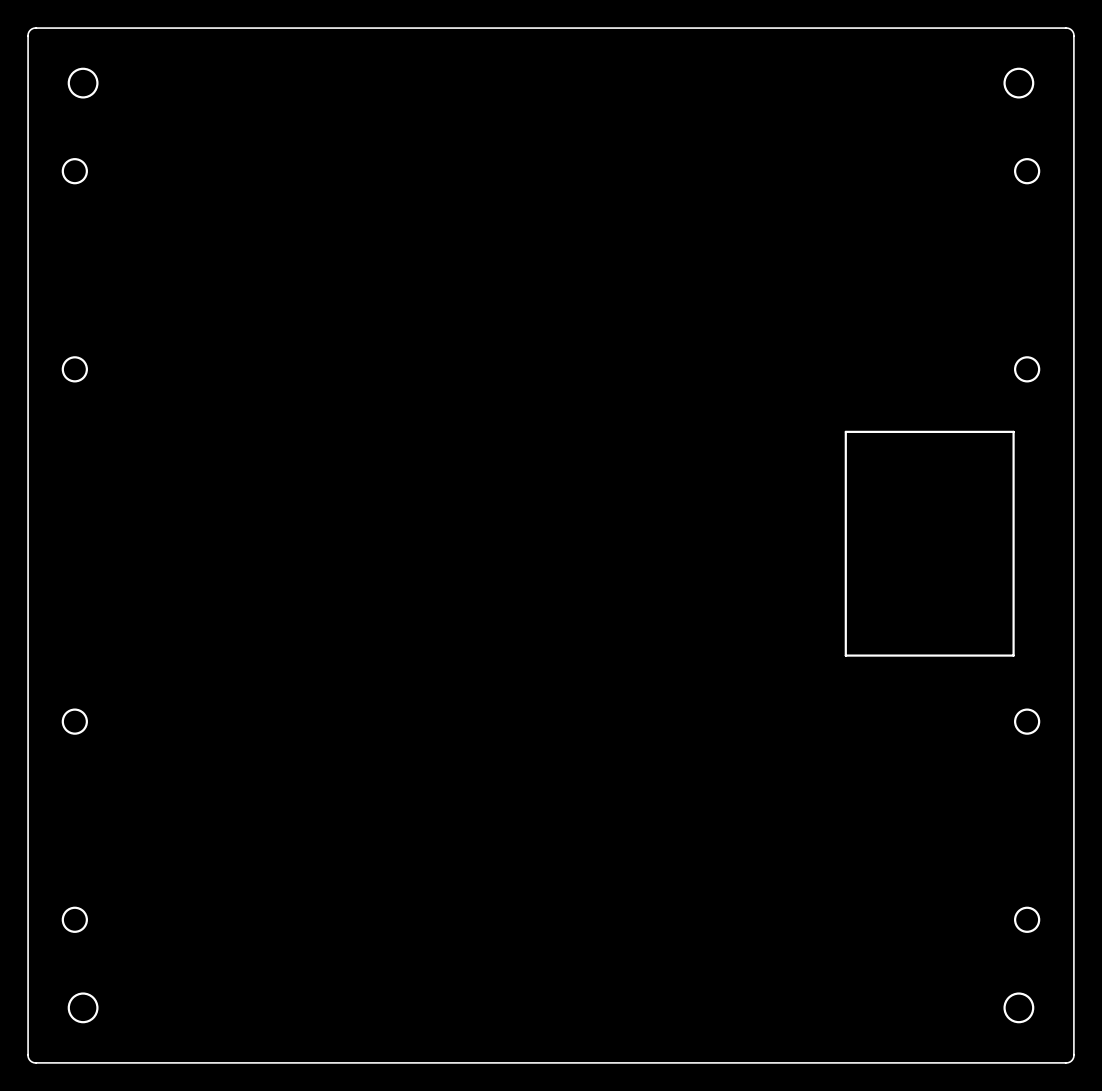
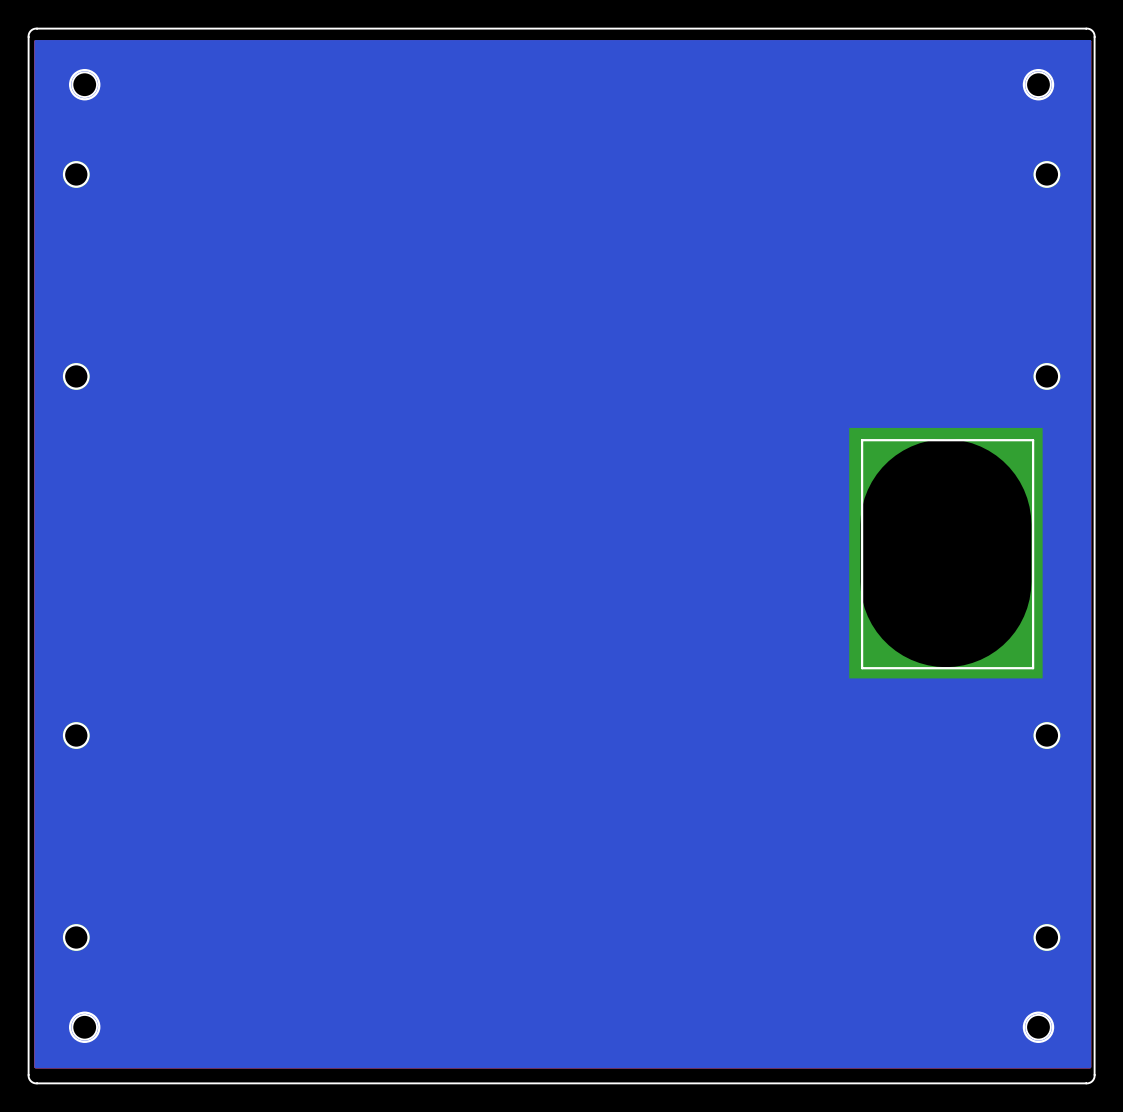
drawing: none -> [34, 40, 1092, 1069]
part: none -> (84, 84)
part: none -> (1038, 84)
part: none -> (76, 174)
part: none -> (1046, 174)
part: none -> (76, 376)
part: none -> (1046, 376)
part: none -> (945, 553)
part: none -> (76, 735)
part: none -> (1046, 735)
part: none -> (76, 937)
part: none -> (1046, 937)
part: none -> (84, 1027)
part: none -> (1038, 1027)

